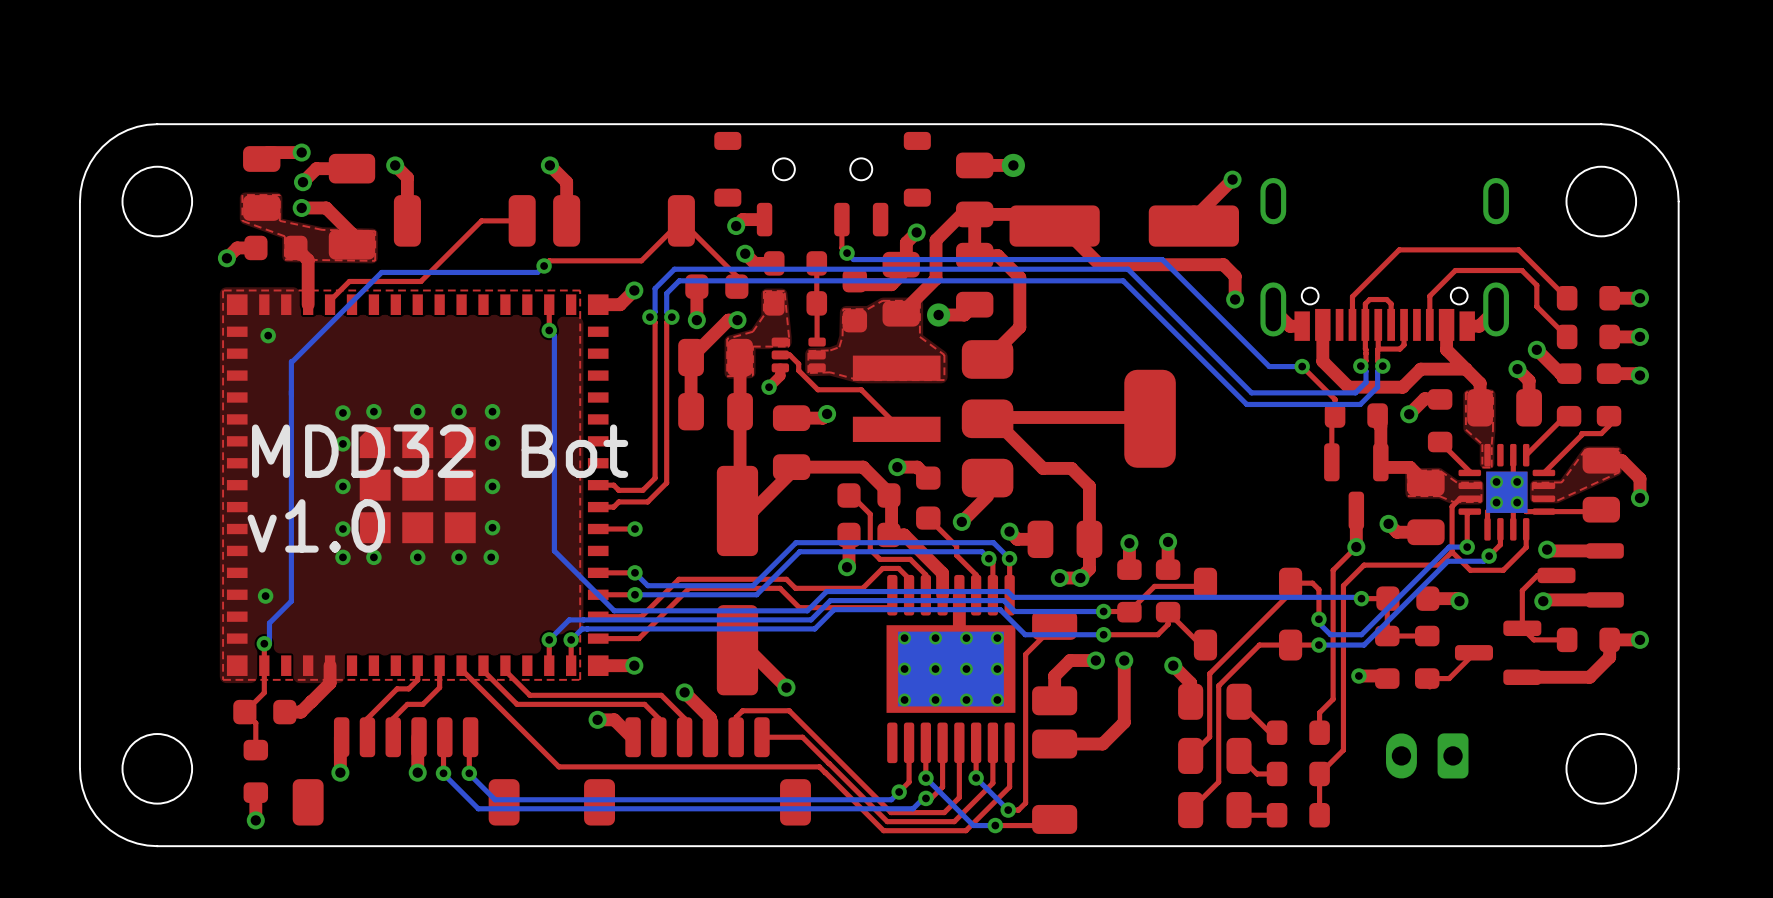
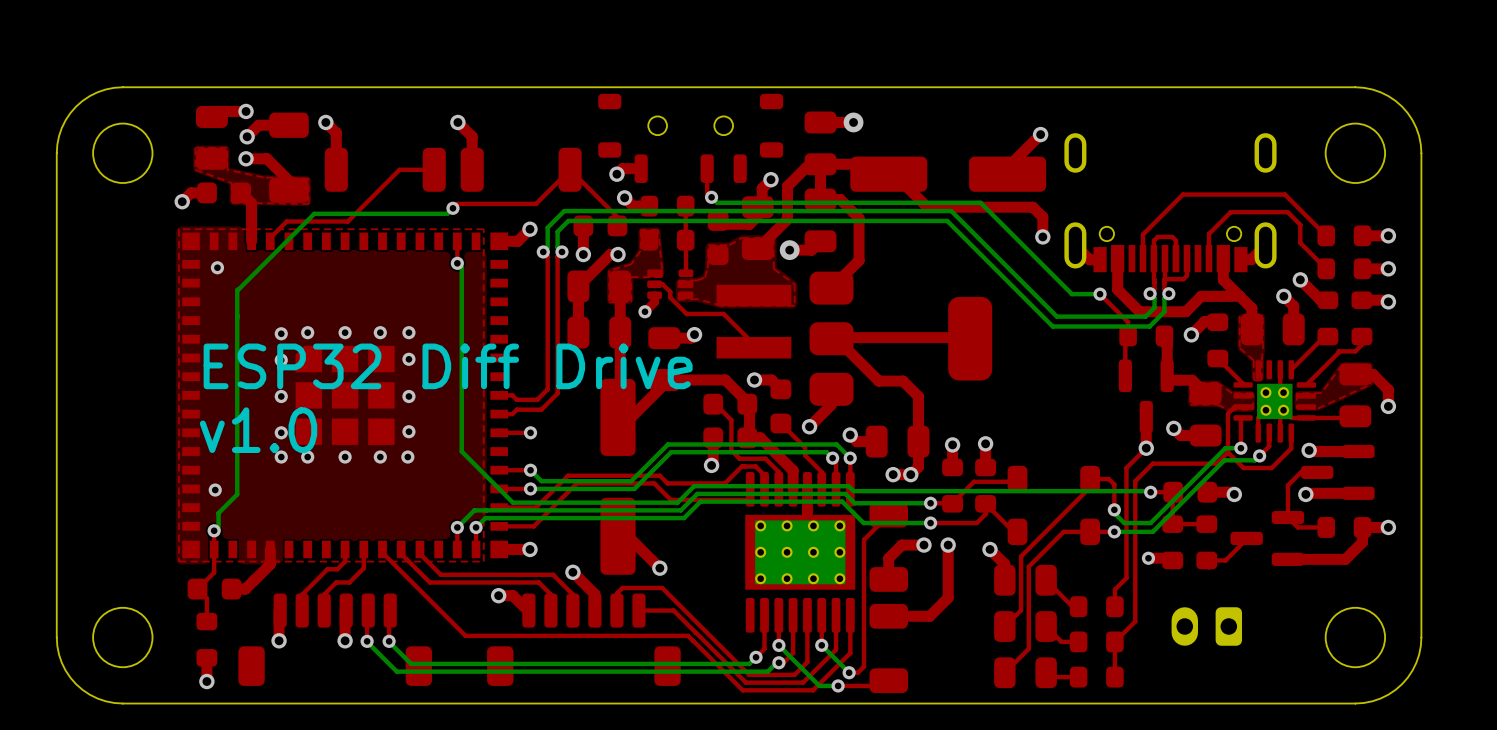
text: MDD32 Bot (440, 451) -> ESP32 Diff Drive (448, 366)

